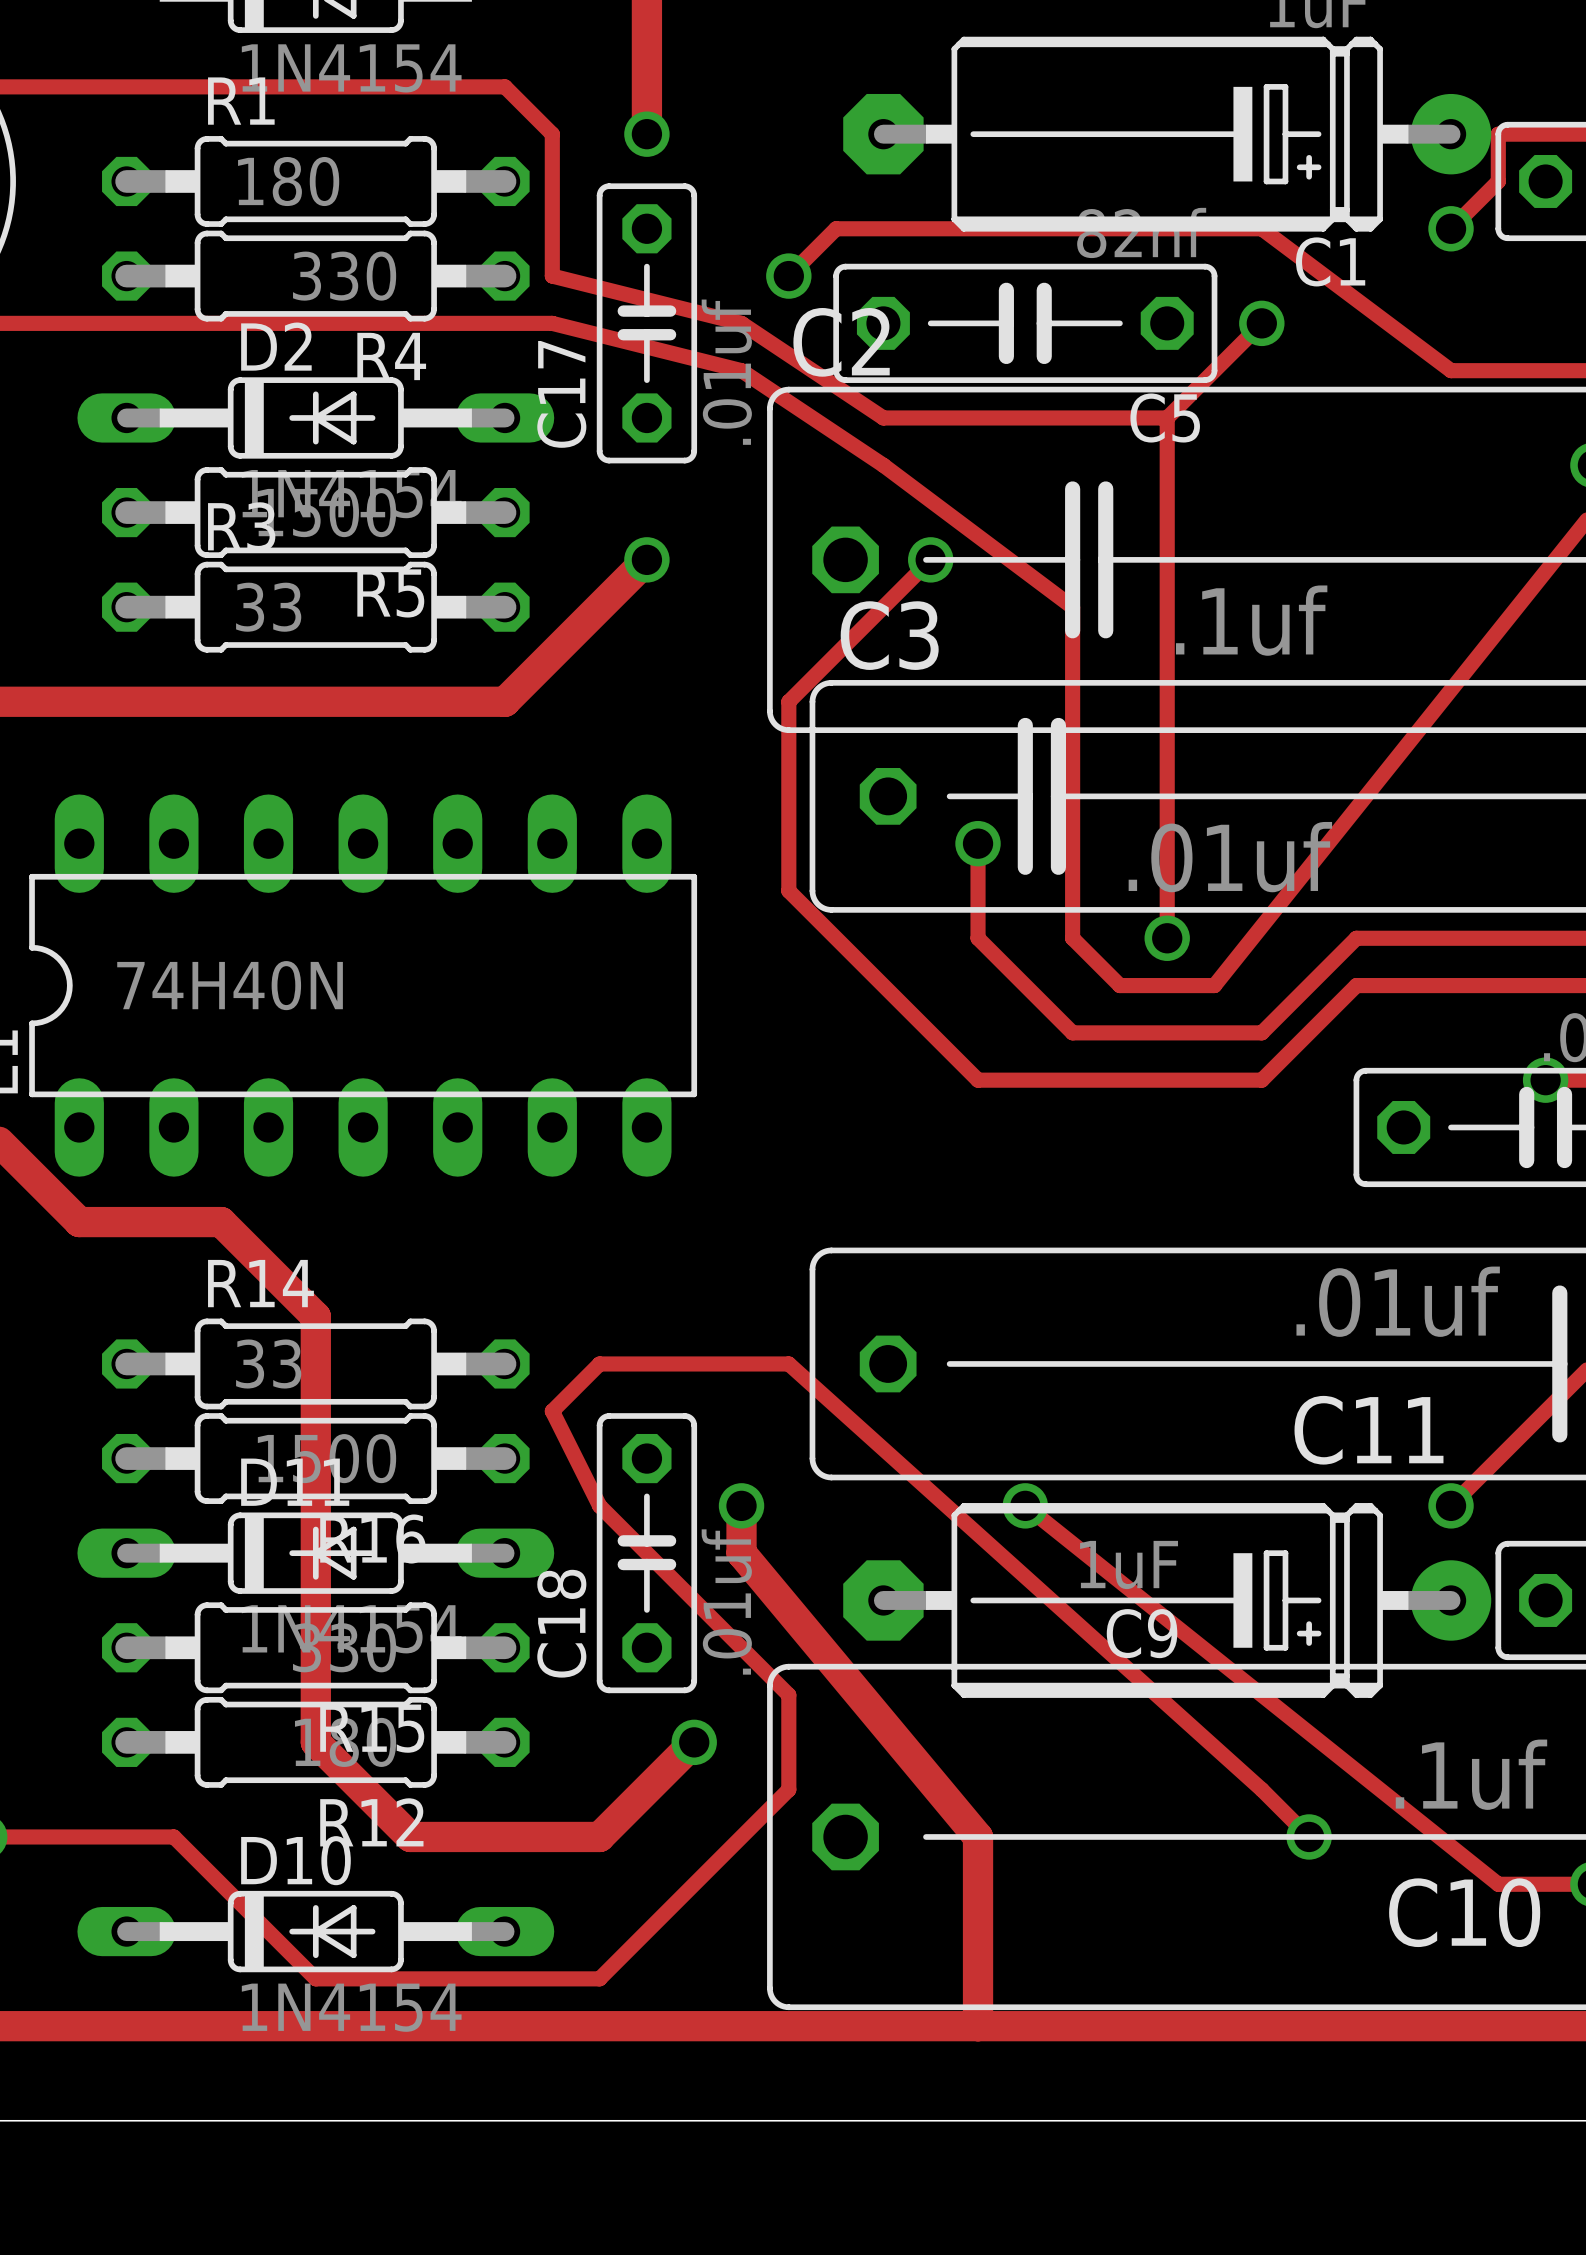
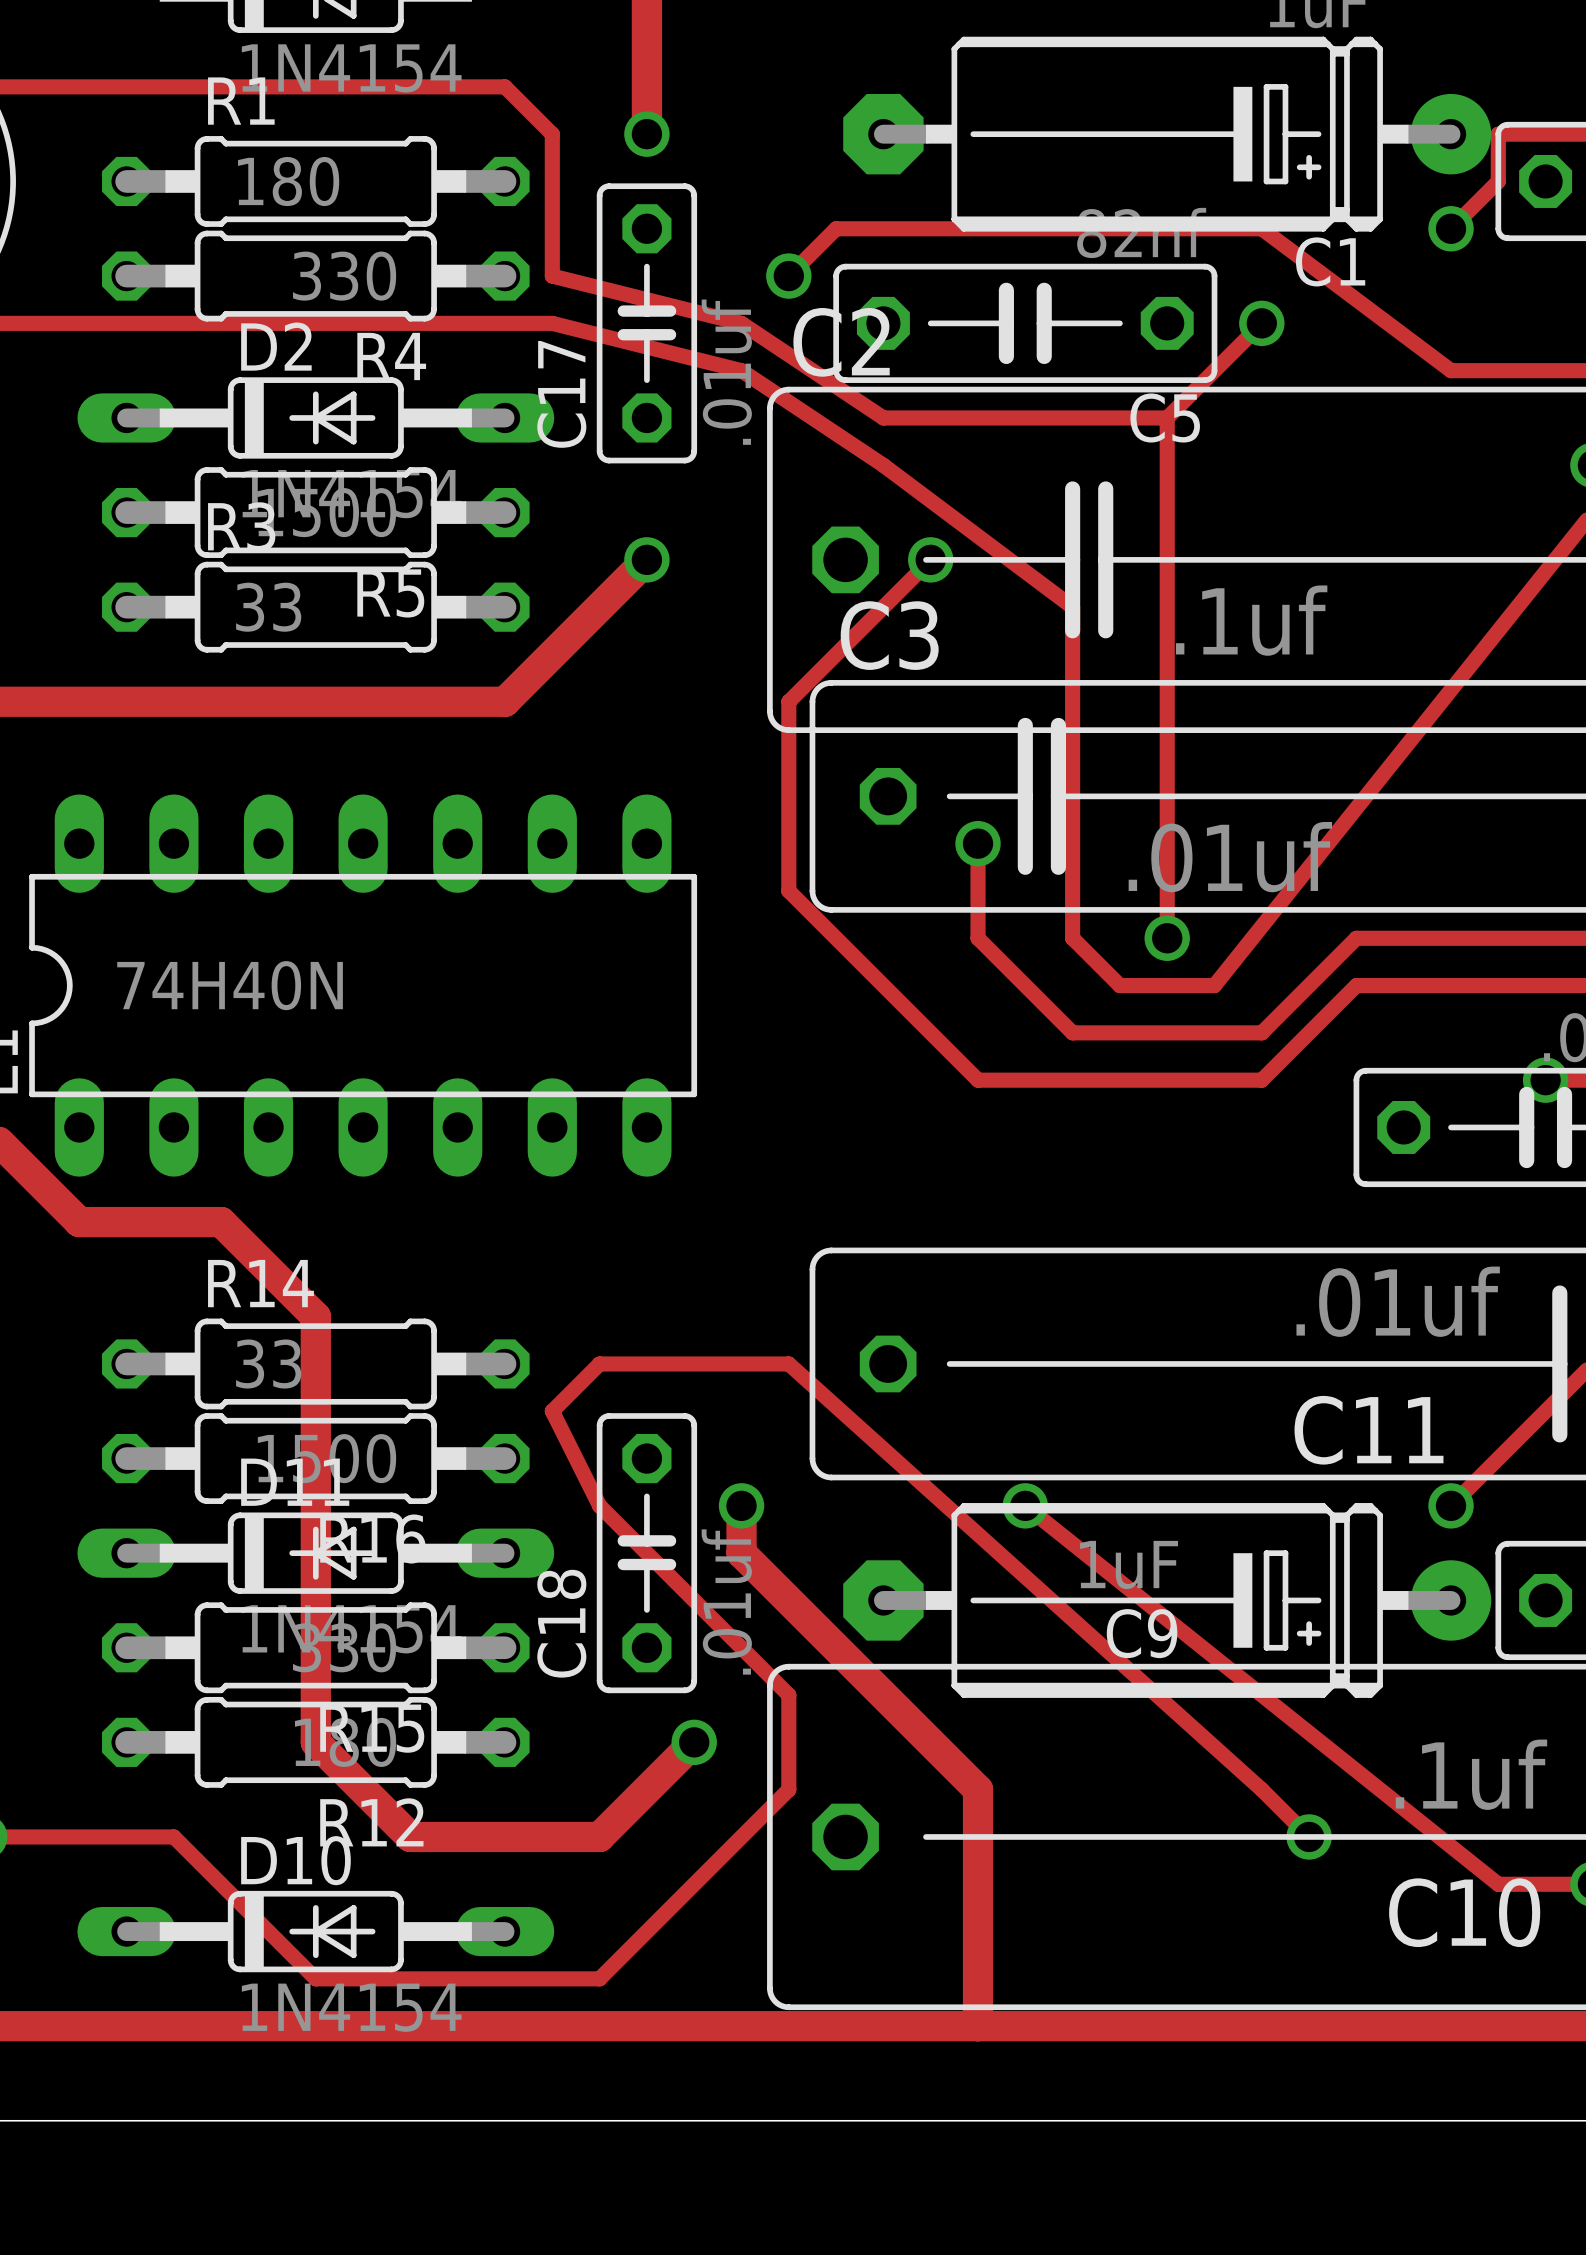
track: (741, 1553) (978, 1836) -> (741, 1553) (978, 1789) (978, 1836)

